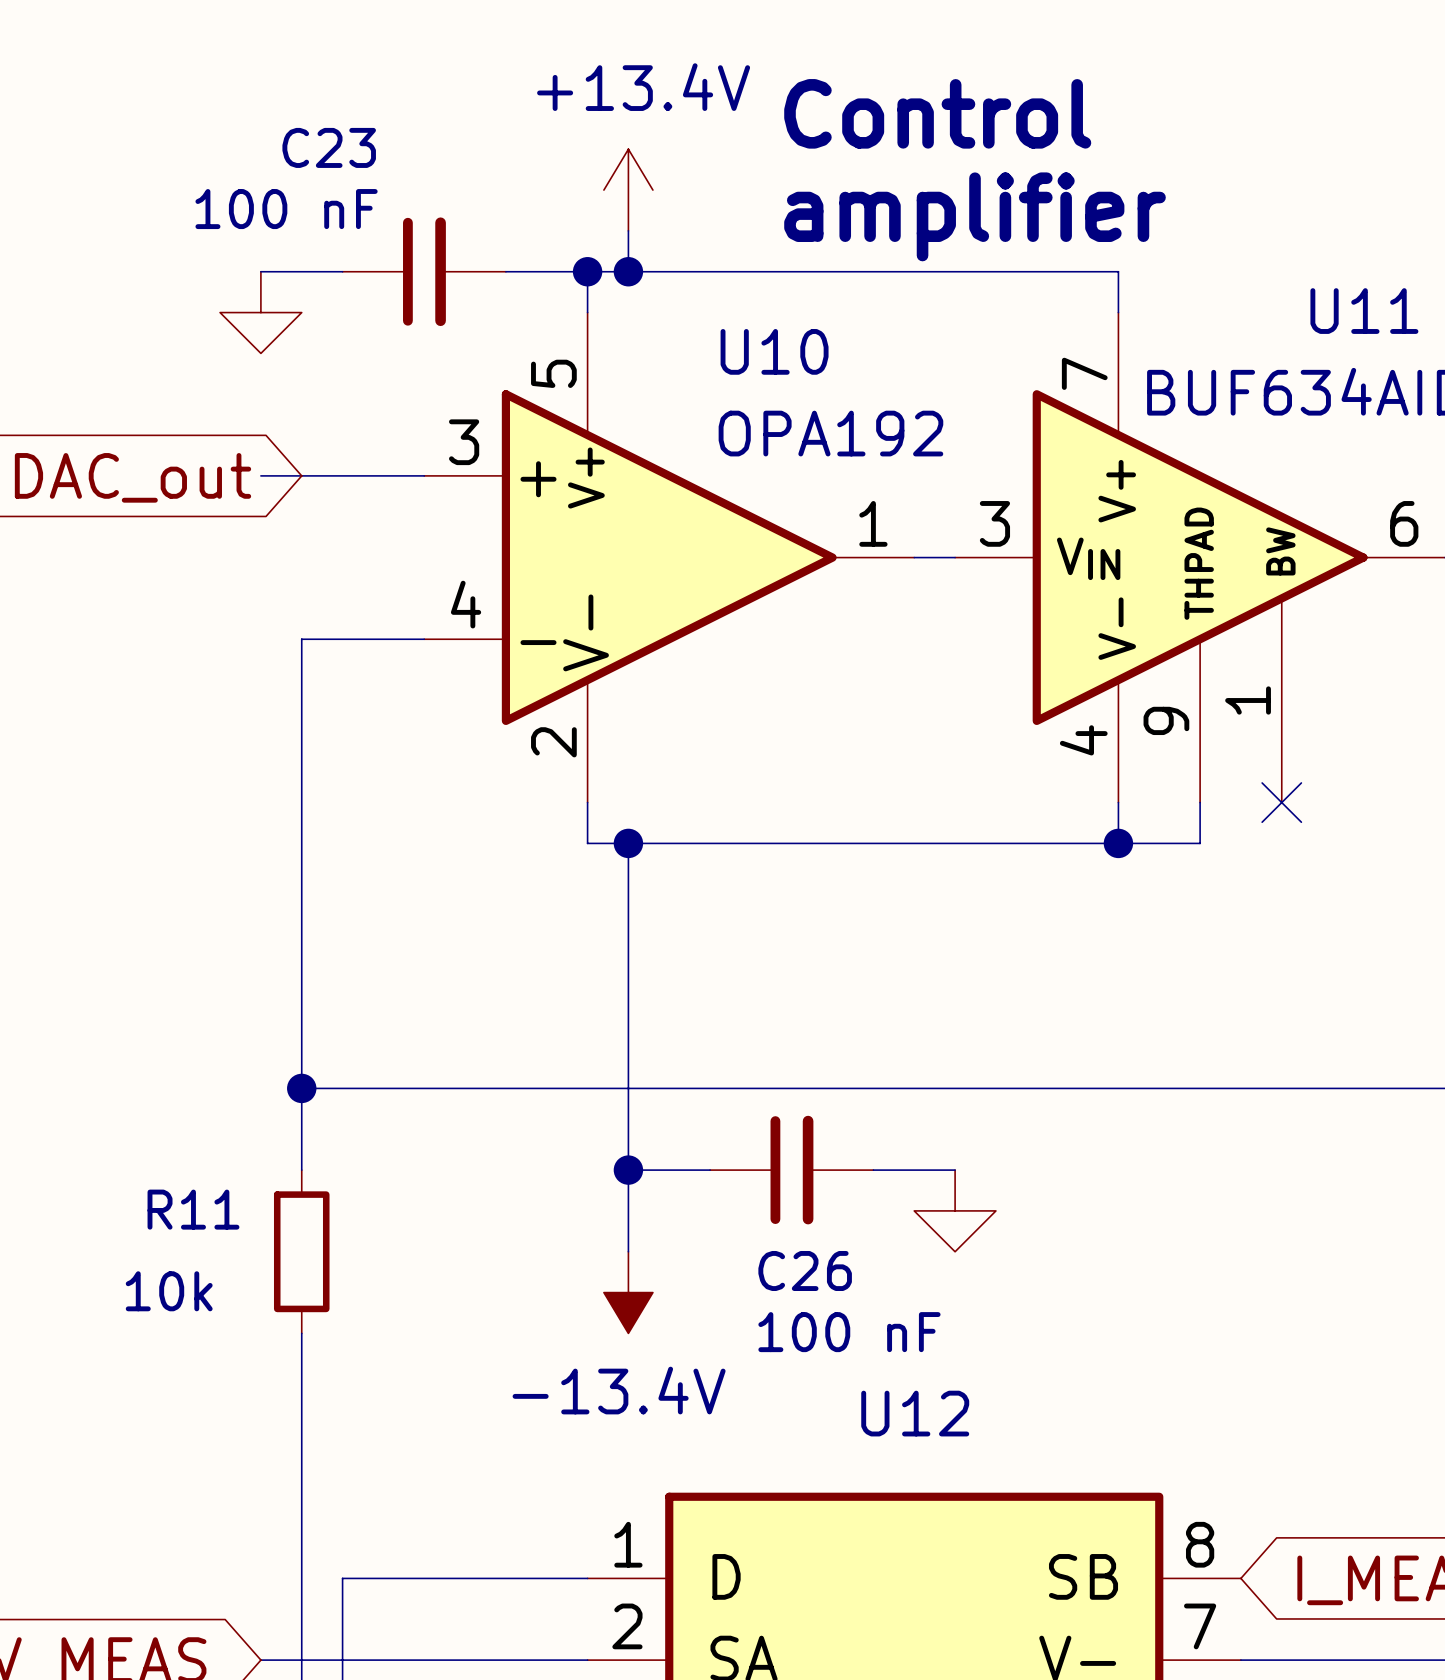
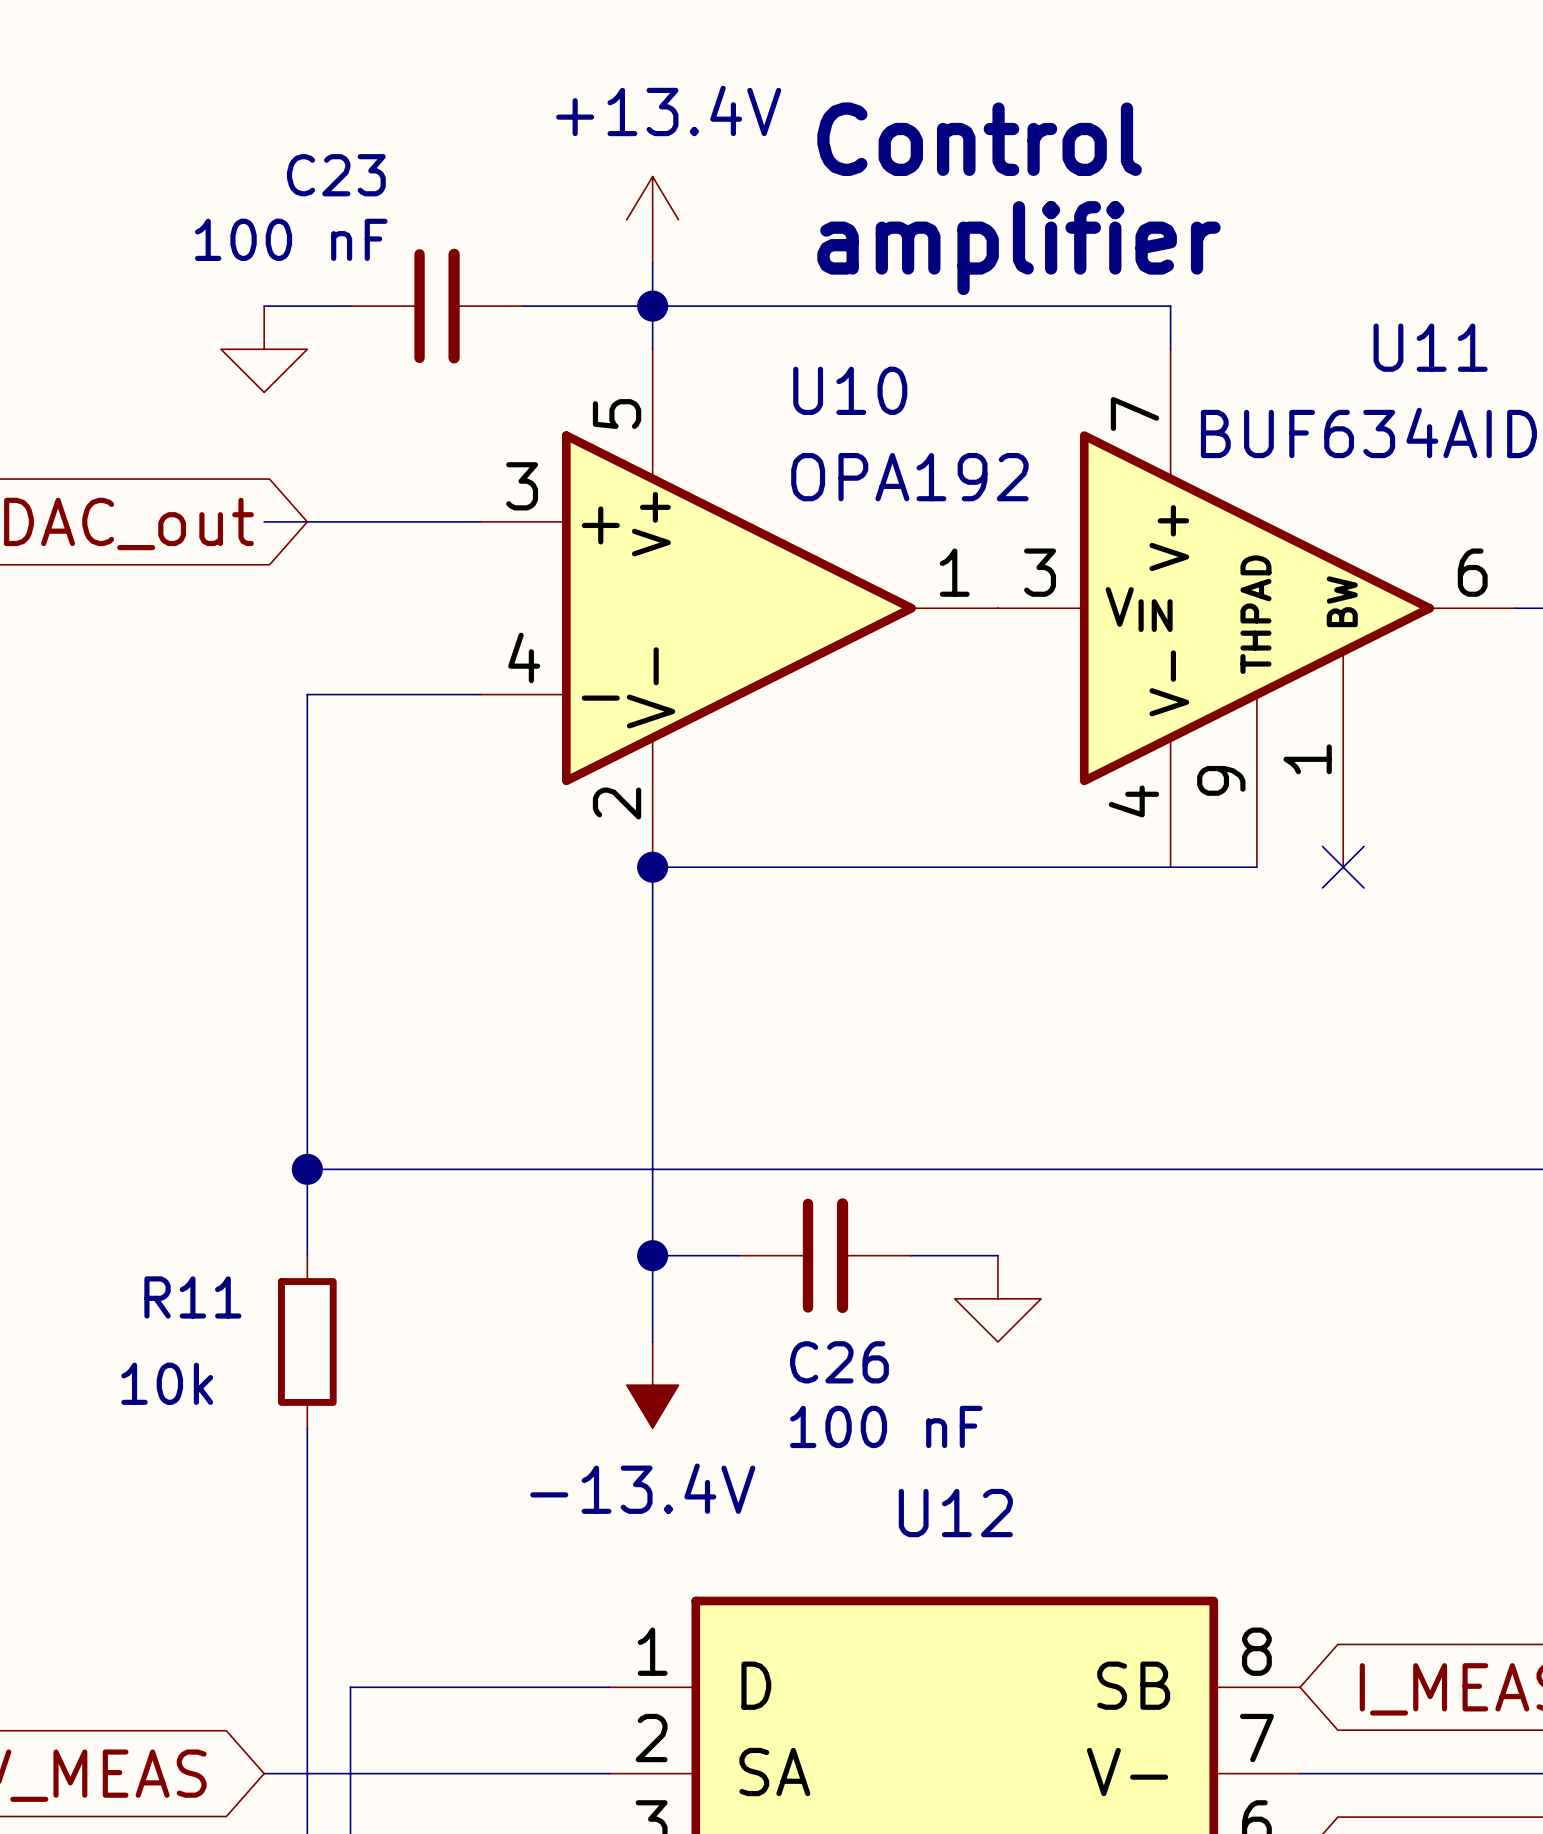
wire: (587, 271) (587, 312) -> (652, 306) (652, 349)
junction: (587, 271) -> none
U10 position: (669, 557) -> (738, 608)
wire: (587, 802) (587, 843) (1200, 843) (1200, 802) -> (652, 910) (652, 867) (1256, 867)
wire: (1118, 802) (1118, 843) -> none
junction position: (628, 843) -> (652, 867)
junction: (1118, 843) -> none

